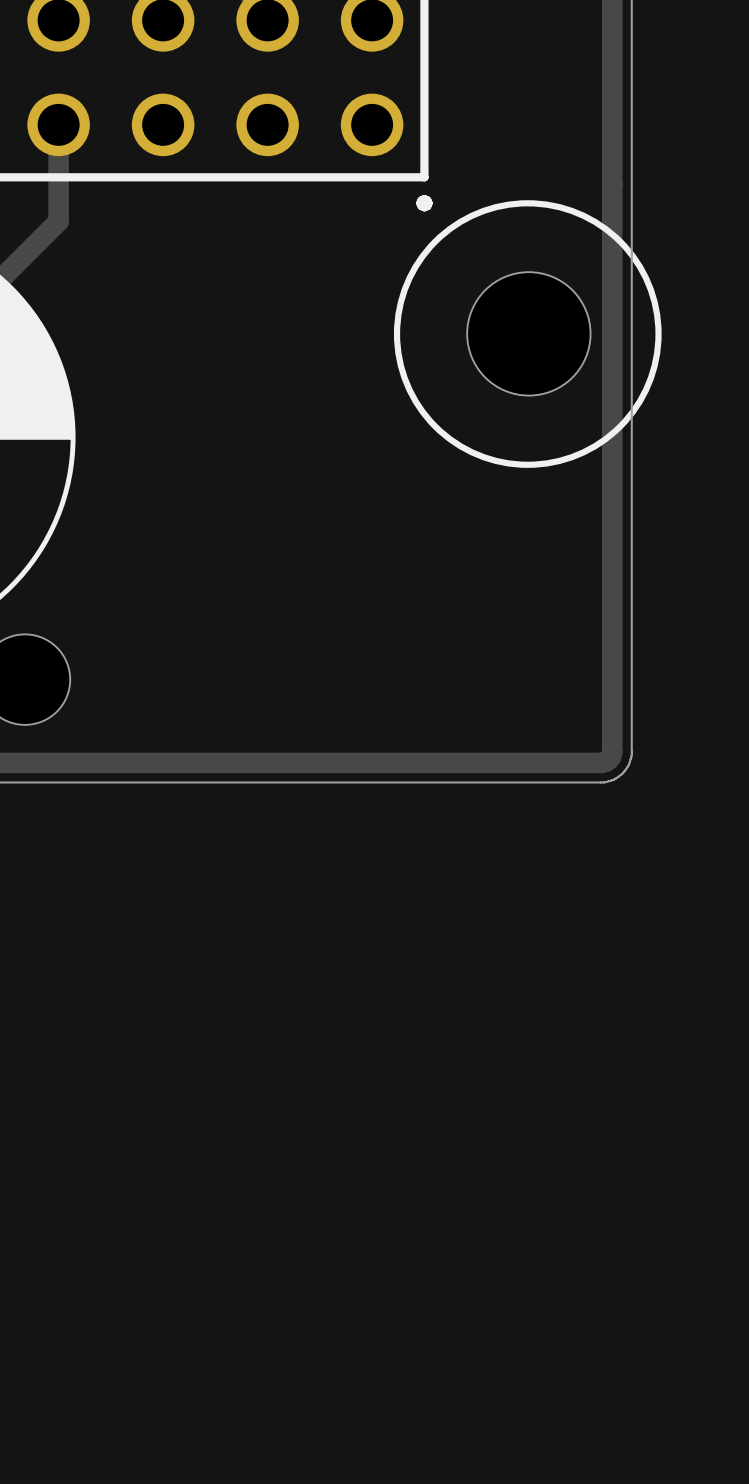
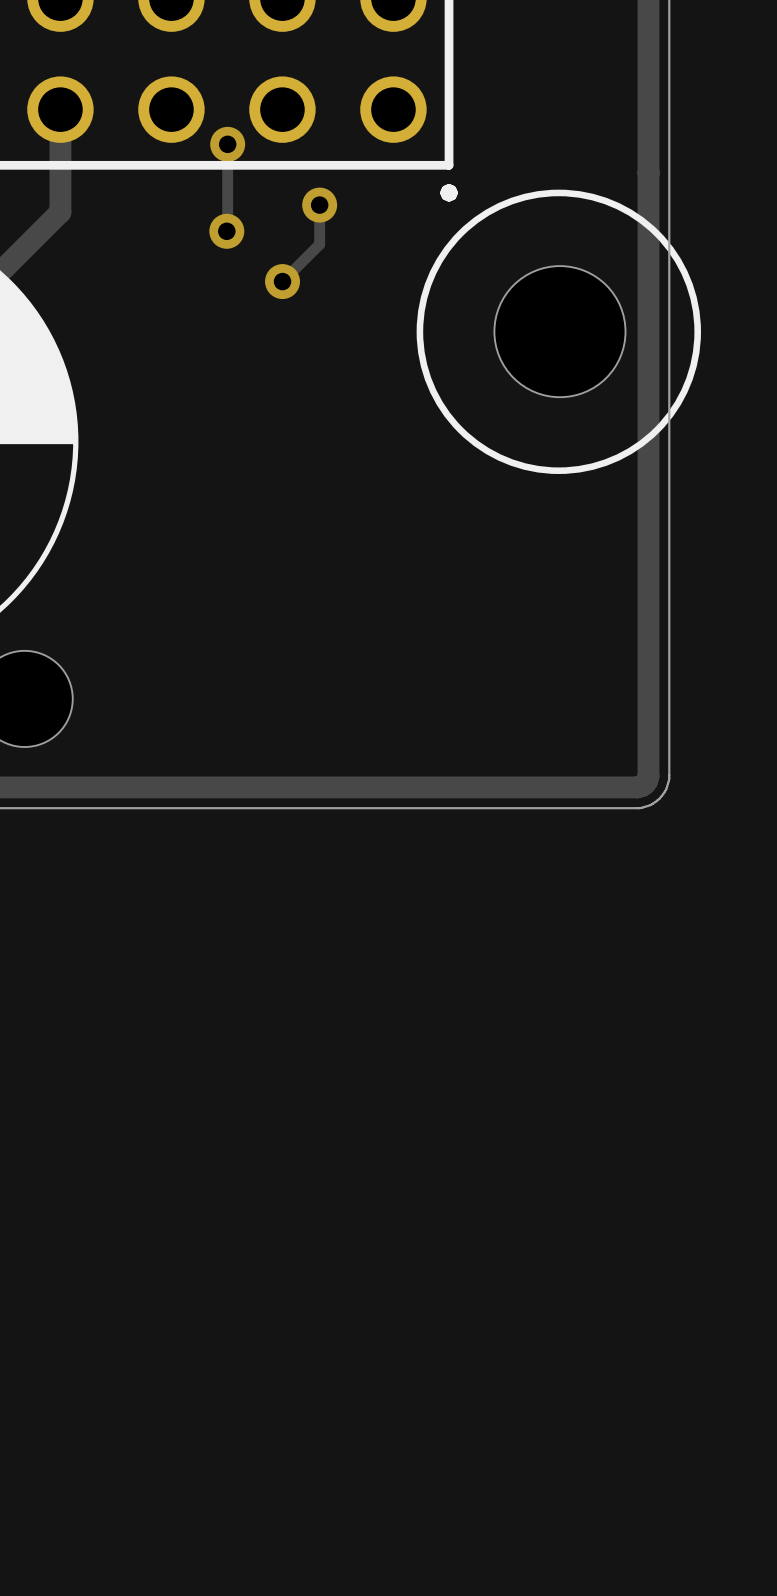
track: none -> (227, 144) (226, 231)
via: none -> (227, 144)
track: none -> (319, 205) (319, 244) (282, 281)
via: none -> (319, 205)
via: none -> (226, 231)
via: none -> (282, 281)

